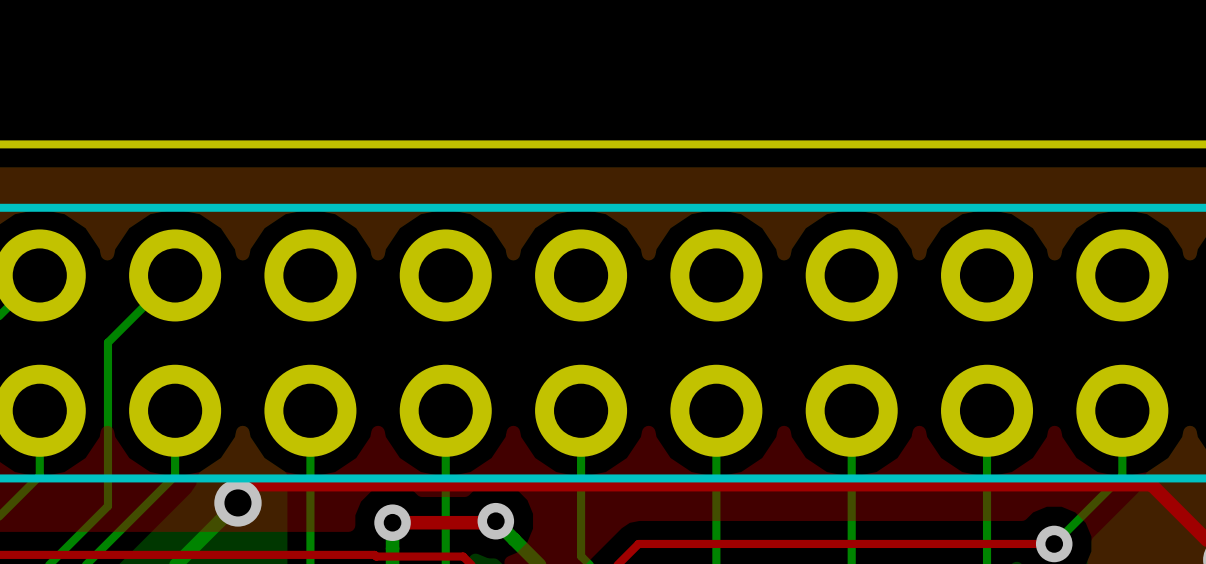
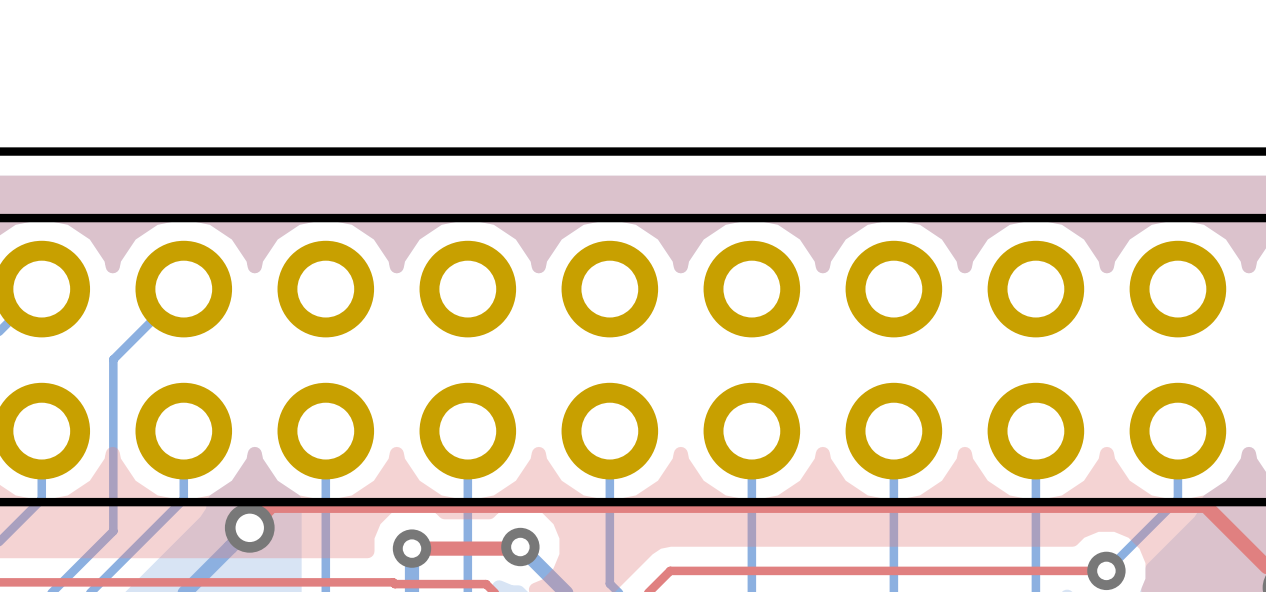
top track width: thick (256, 484) (1151, 484) -> thin (268, 508) (1208, 508)

